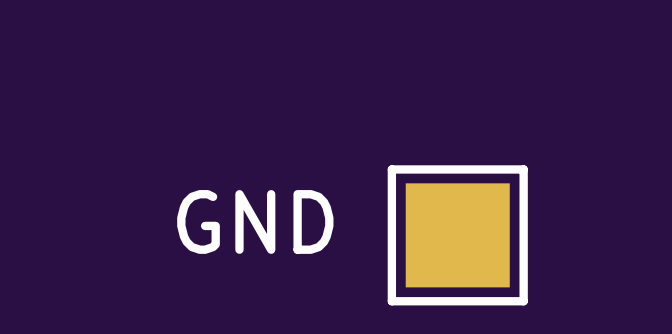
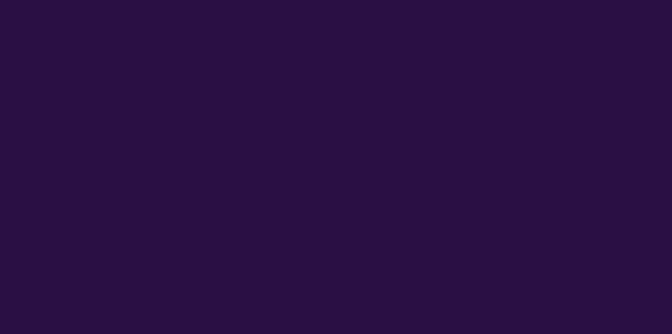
text: GND (255, 221) -> none
part: (457, 235) -> none

